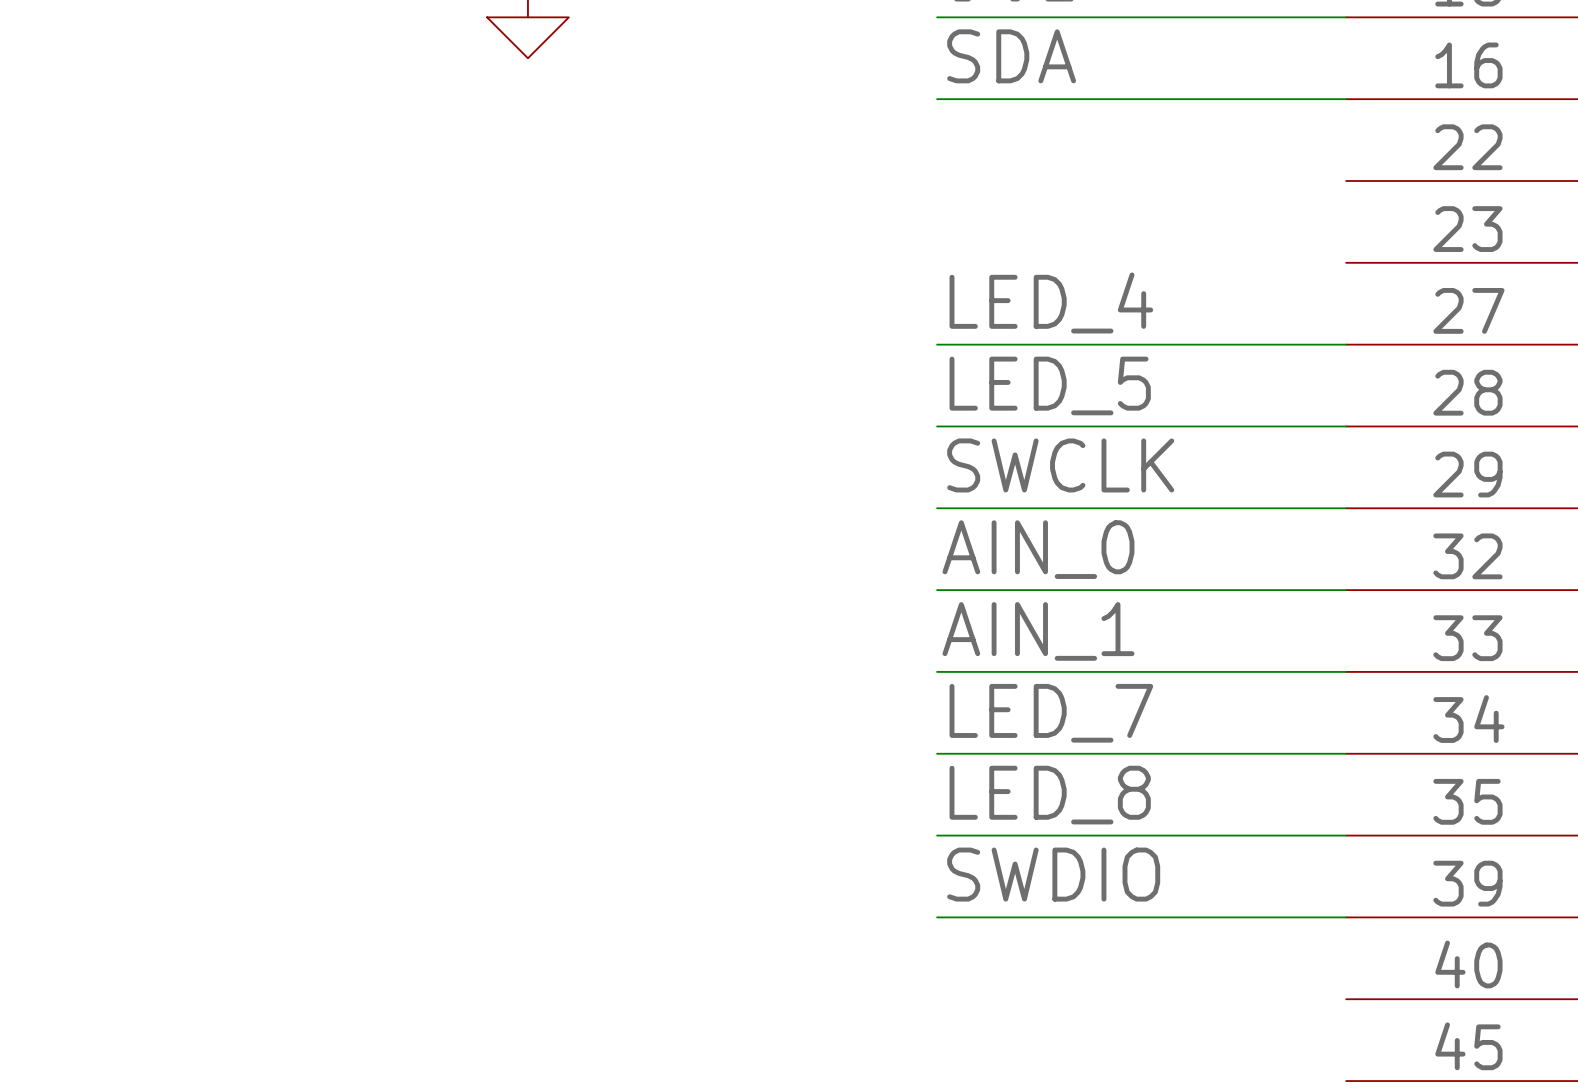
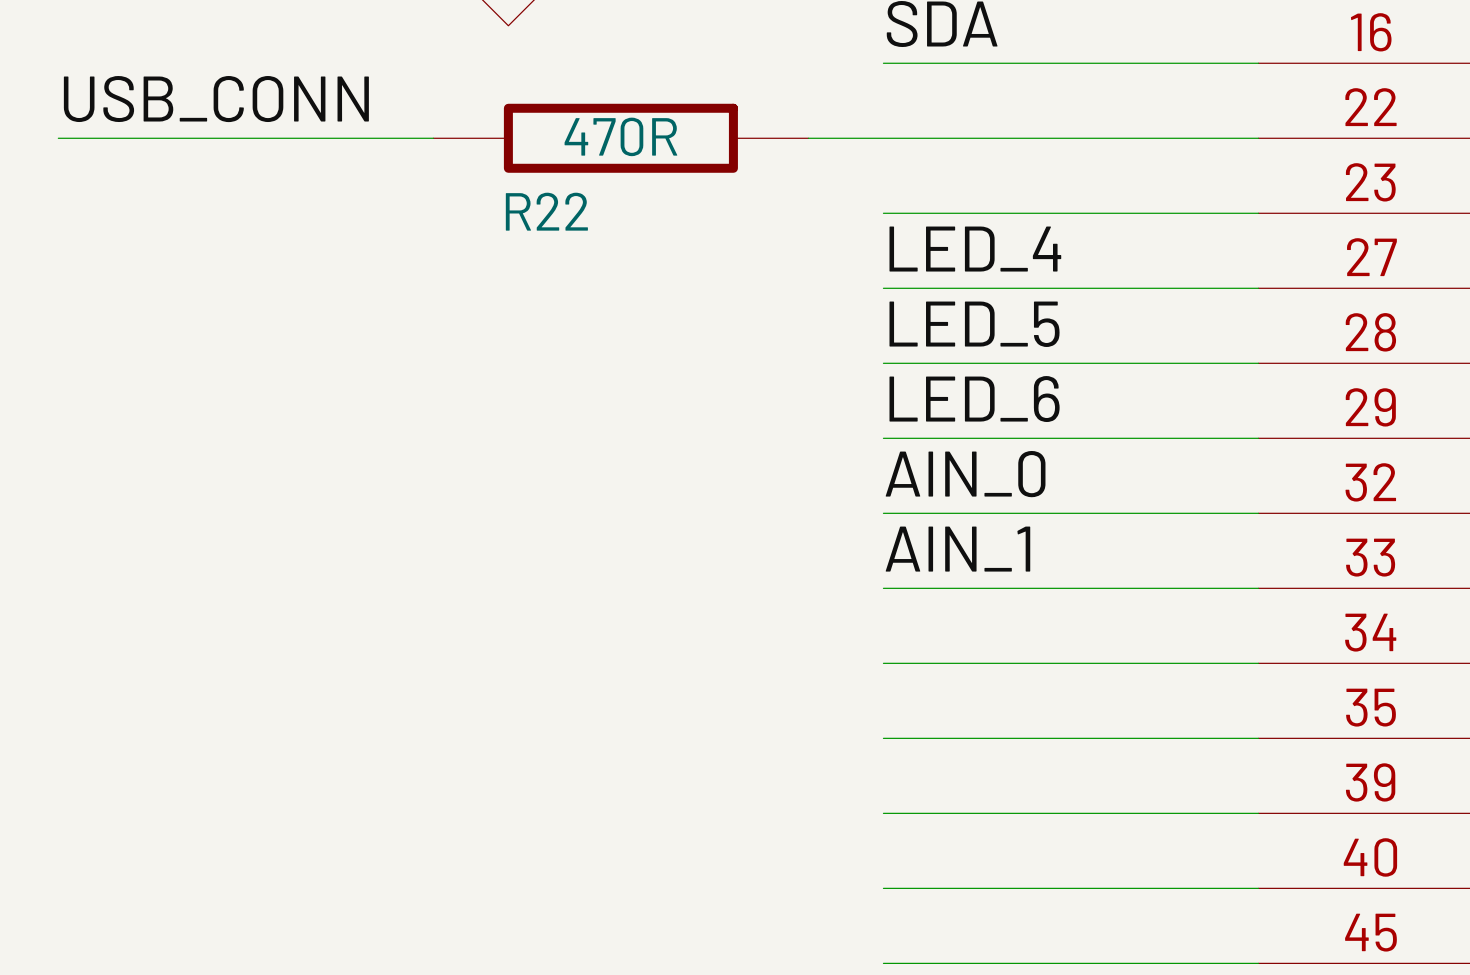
label: none -> USB_CONN (216, 99)
wire: none -> (58, 138) (433, 138)
R22: none -> 470R (620, 138)
wire: none -> (808, 138) (1258, 138)
wire: none -> (883, 213) (1258, 213)
label: SWCLK (1060, 465) -> LED_6 (974, 399)
label: LED_7 (1051, 713) -> none
label: LED_8 (1050, 795) -> none
label: SWDIO (1053, 874) -> none
wire: none -> (883, 888) (1258, 888)
wire: none -> (883, 963) (1258, 963)

